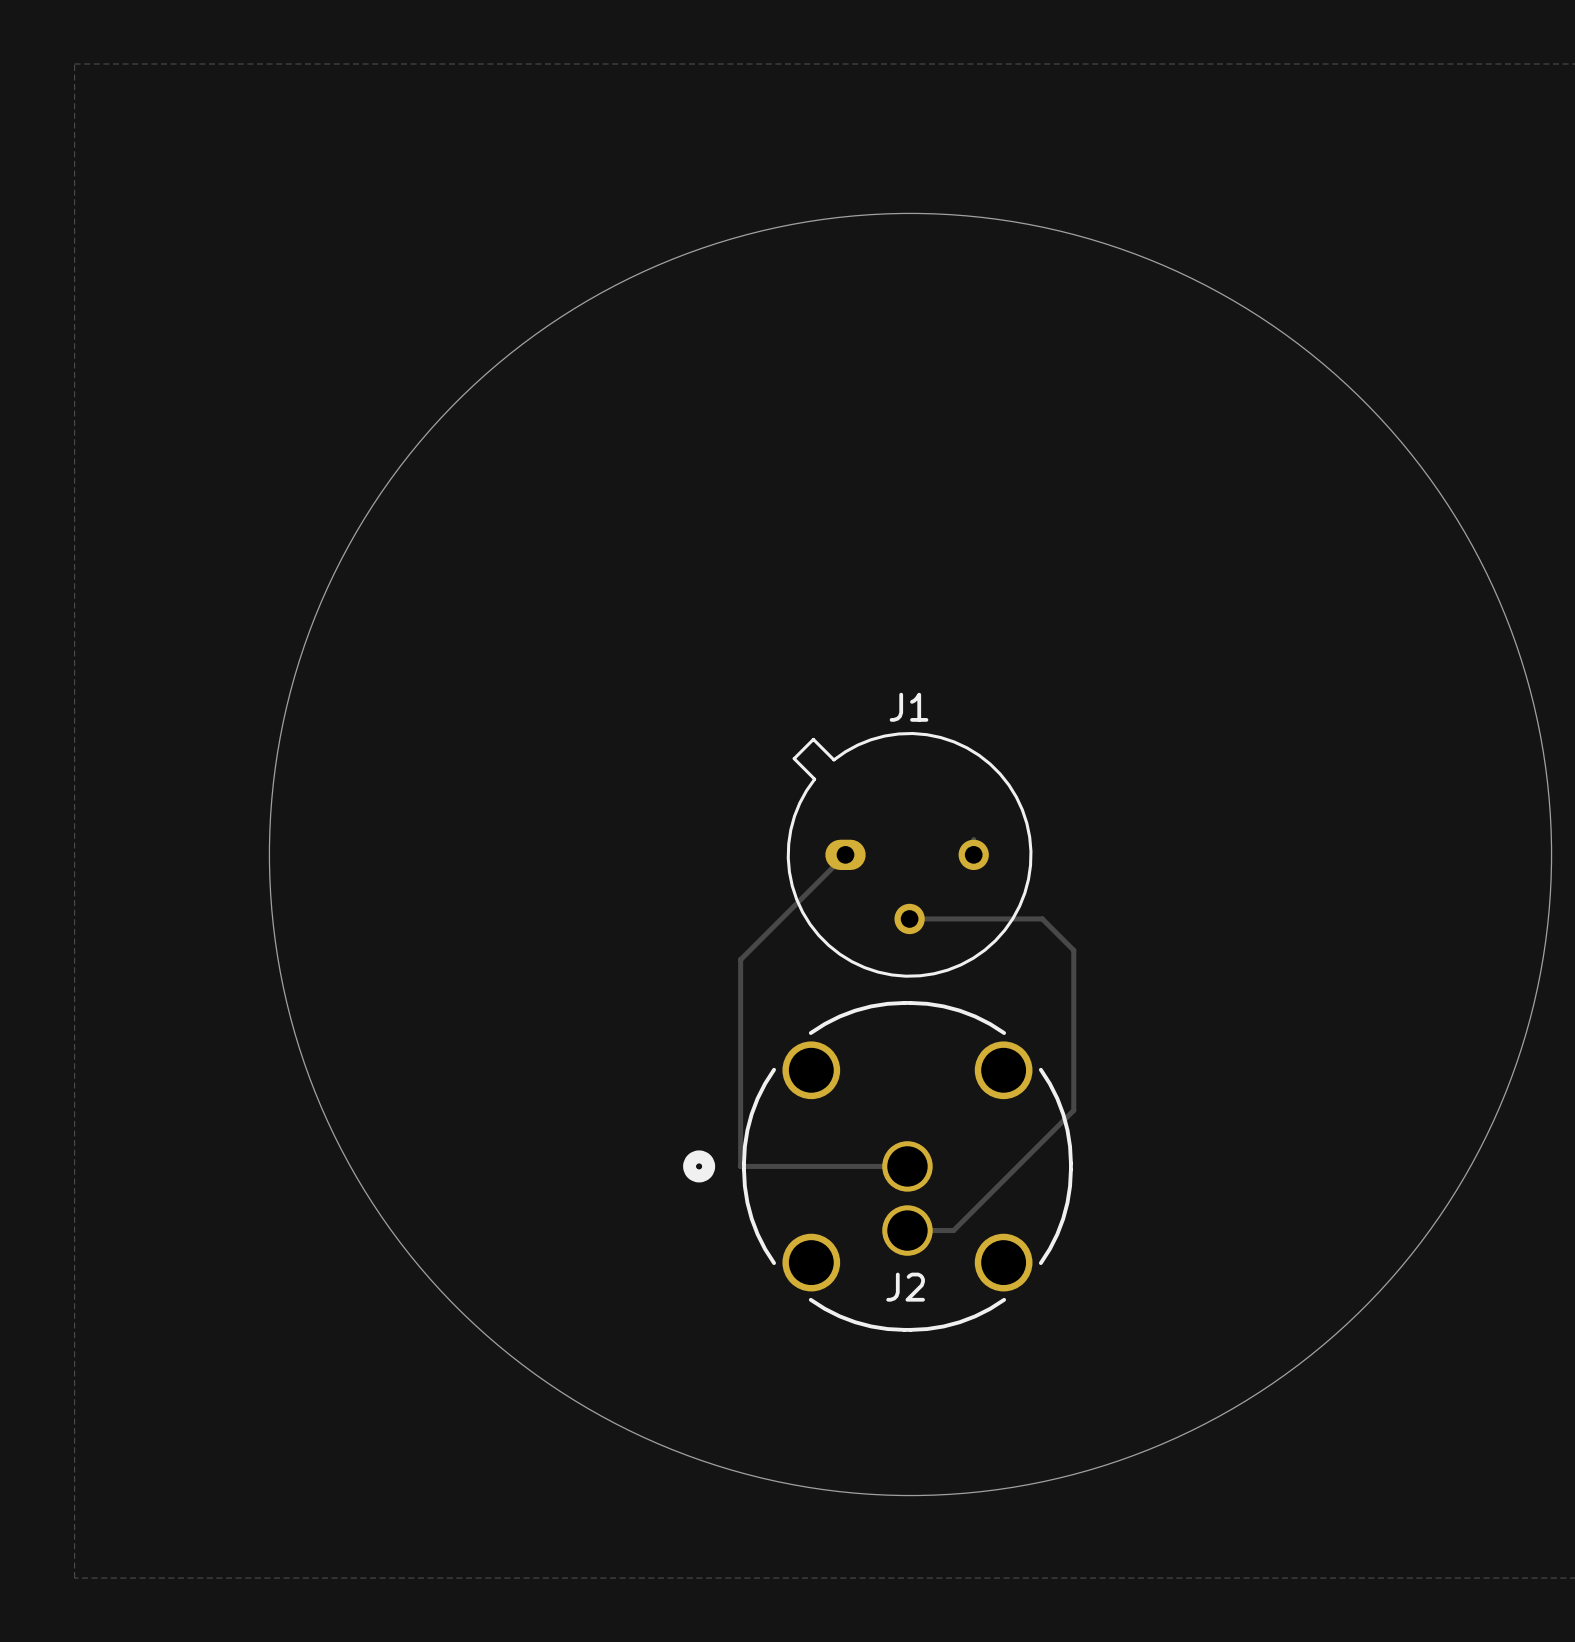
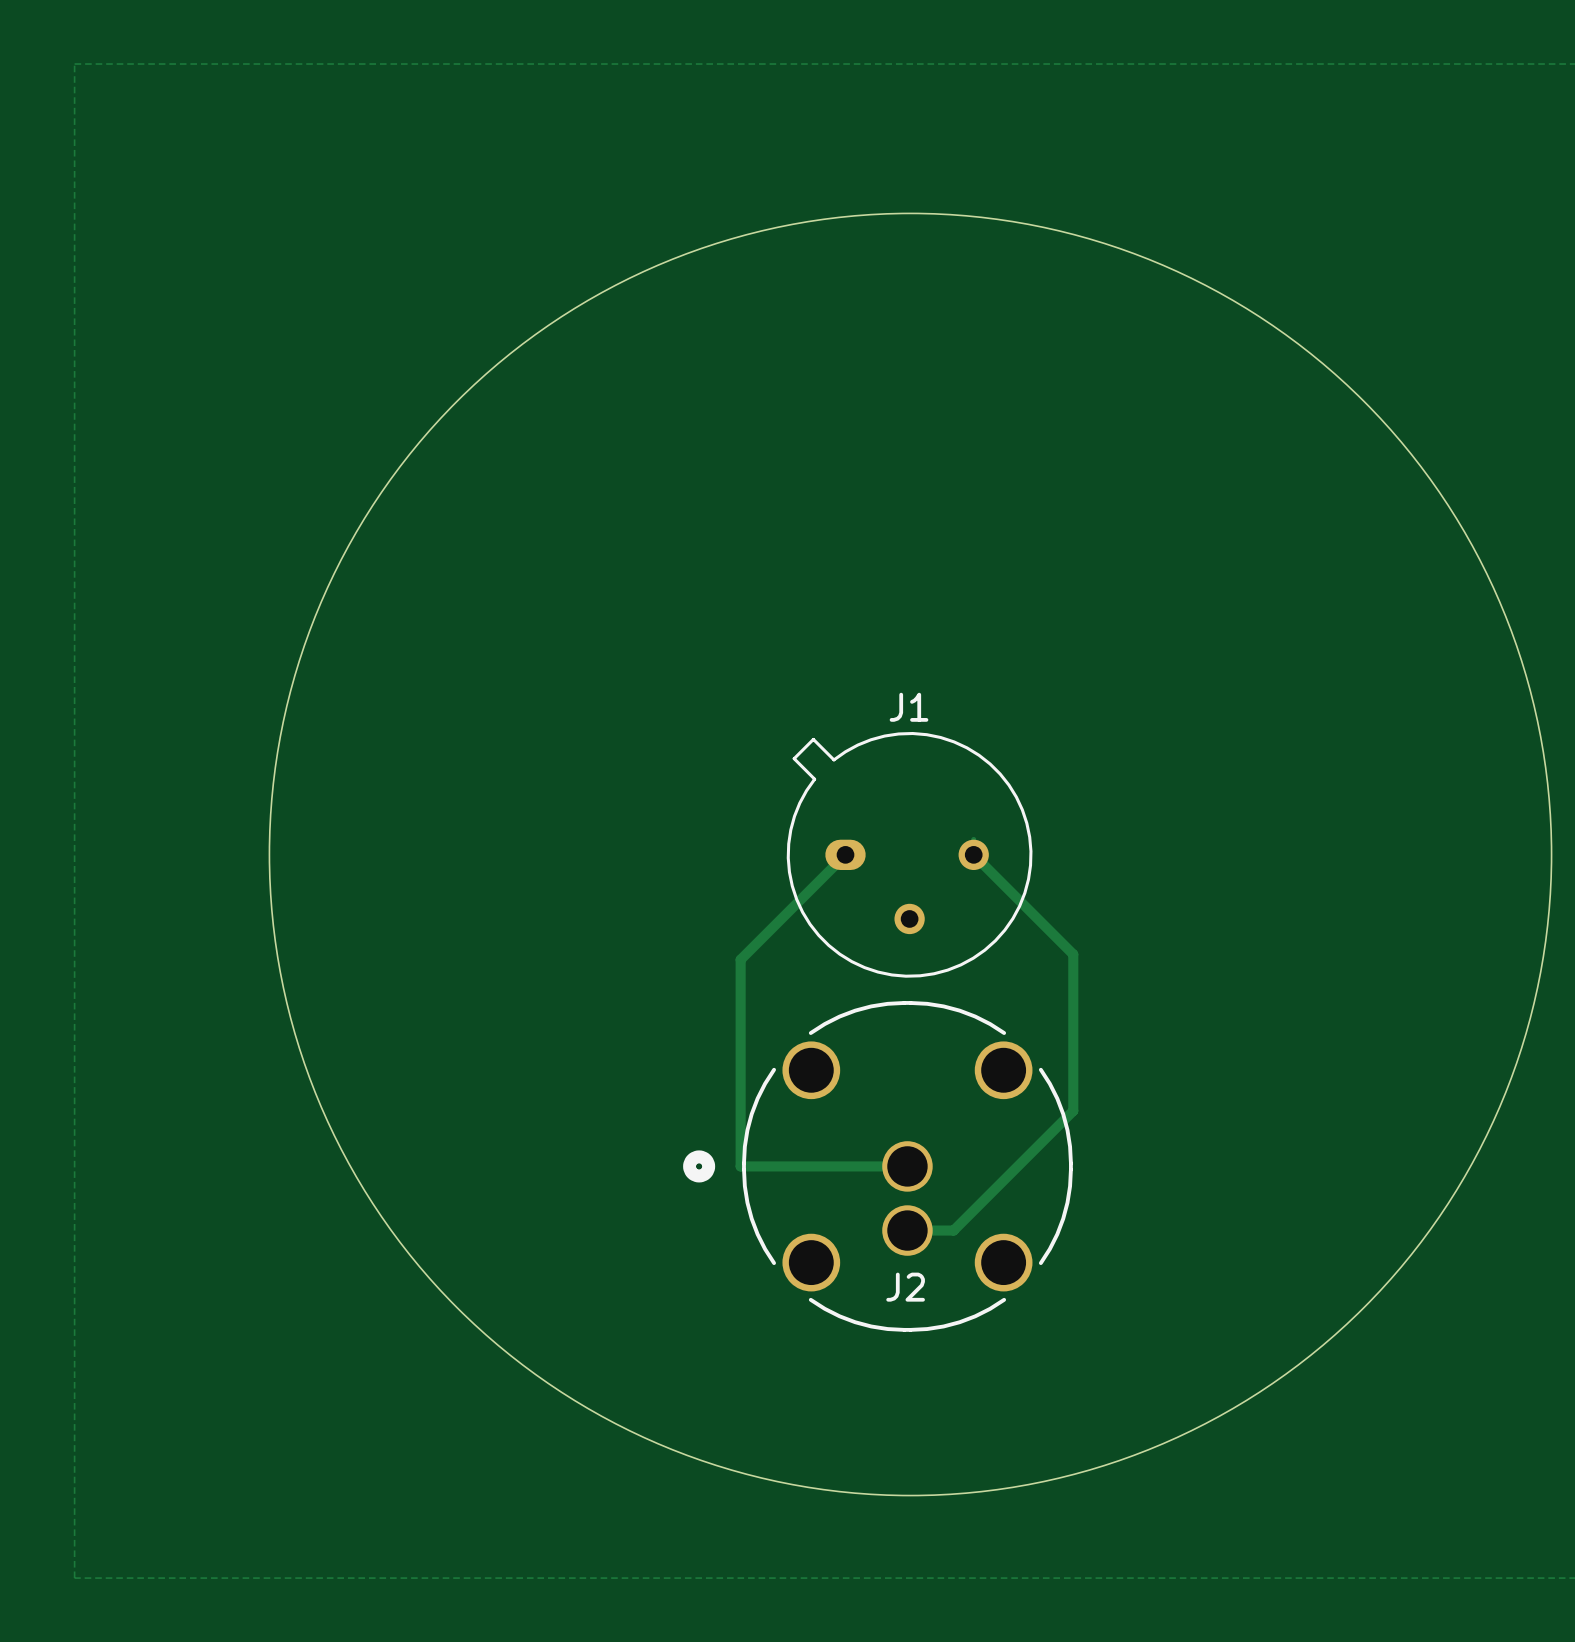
track width: thin (845, 854) (740, 959) (740, 1166) (907, 1166) -> thick (845, 854) (740, 959) (740, 1166) (907, 1166)
track: (909, 918) (1042, 918) (1073, 950) (1073, 1110) -> (973, 854) (1073, 954) (1073, 1110)
track width: thin (1073, 1110) (953, 1230) (907, 1230) -> thick (1073, 1110) (953, 1230) (907, 1230)

